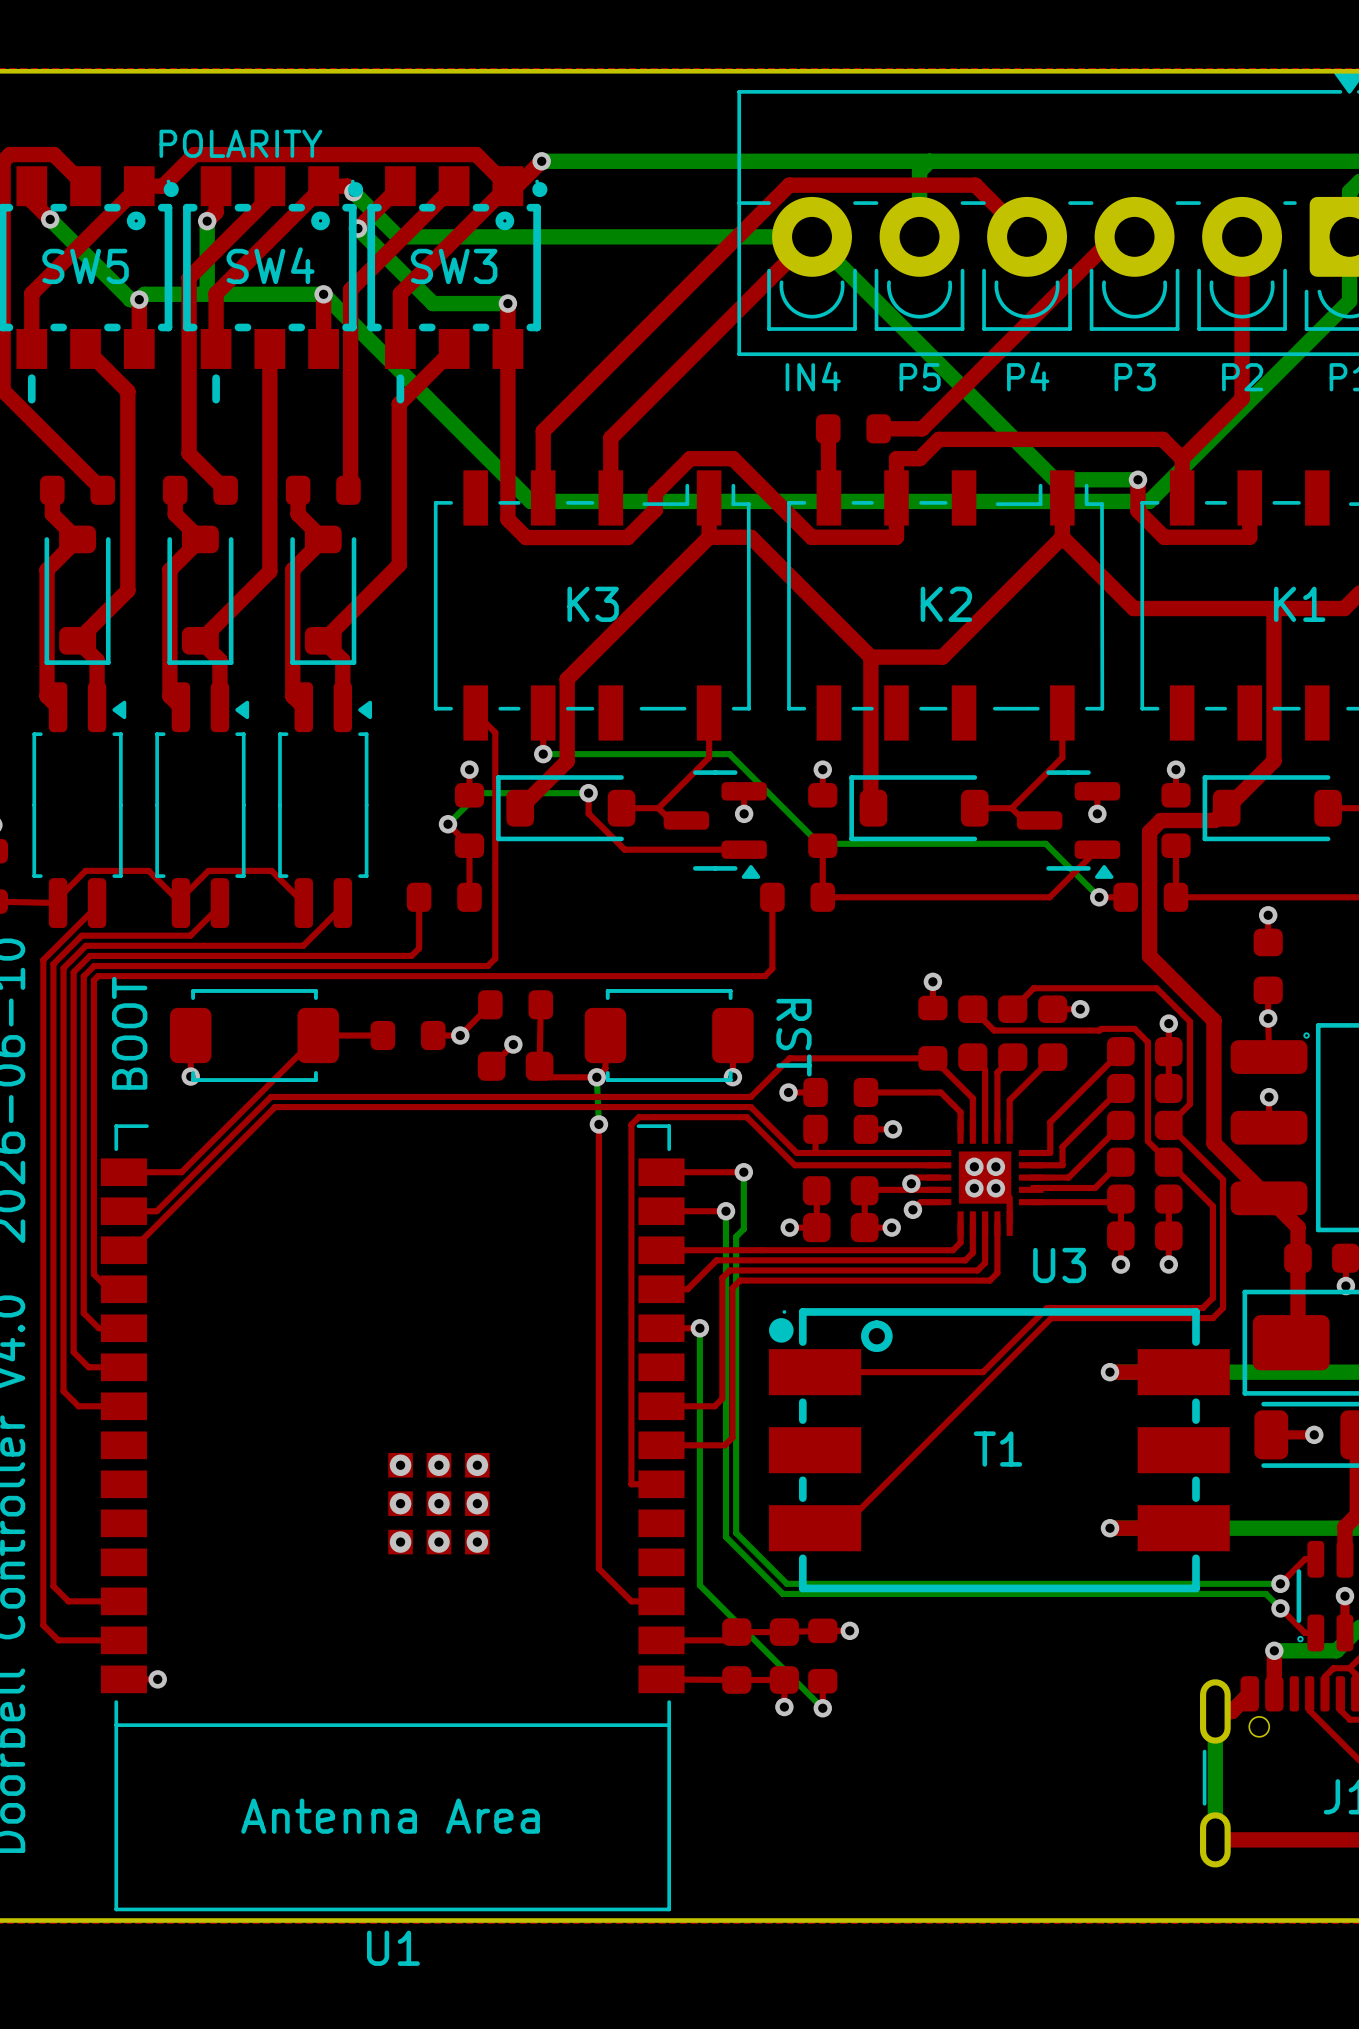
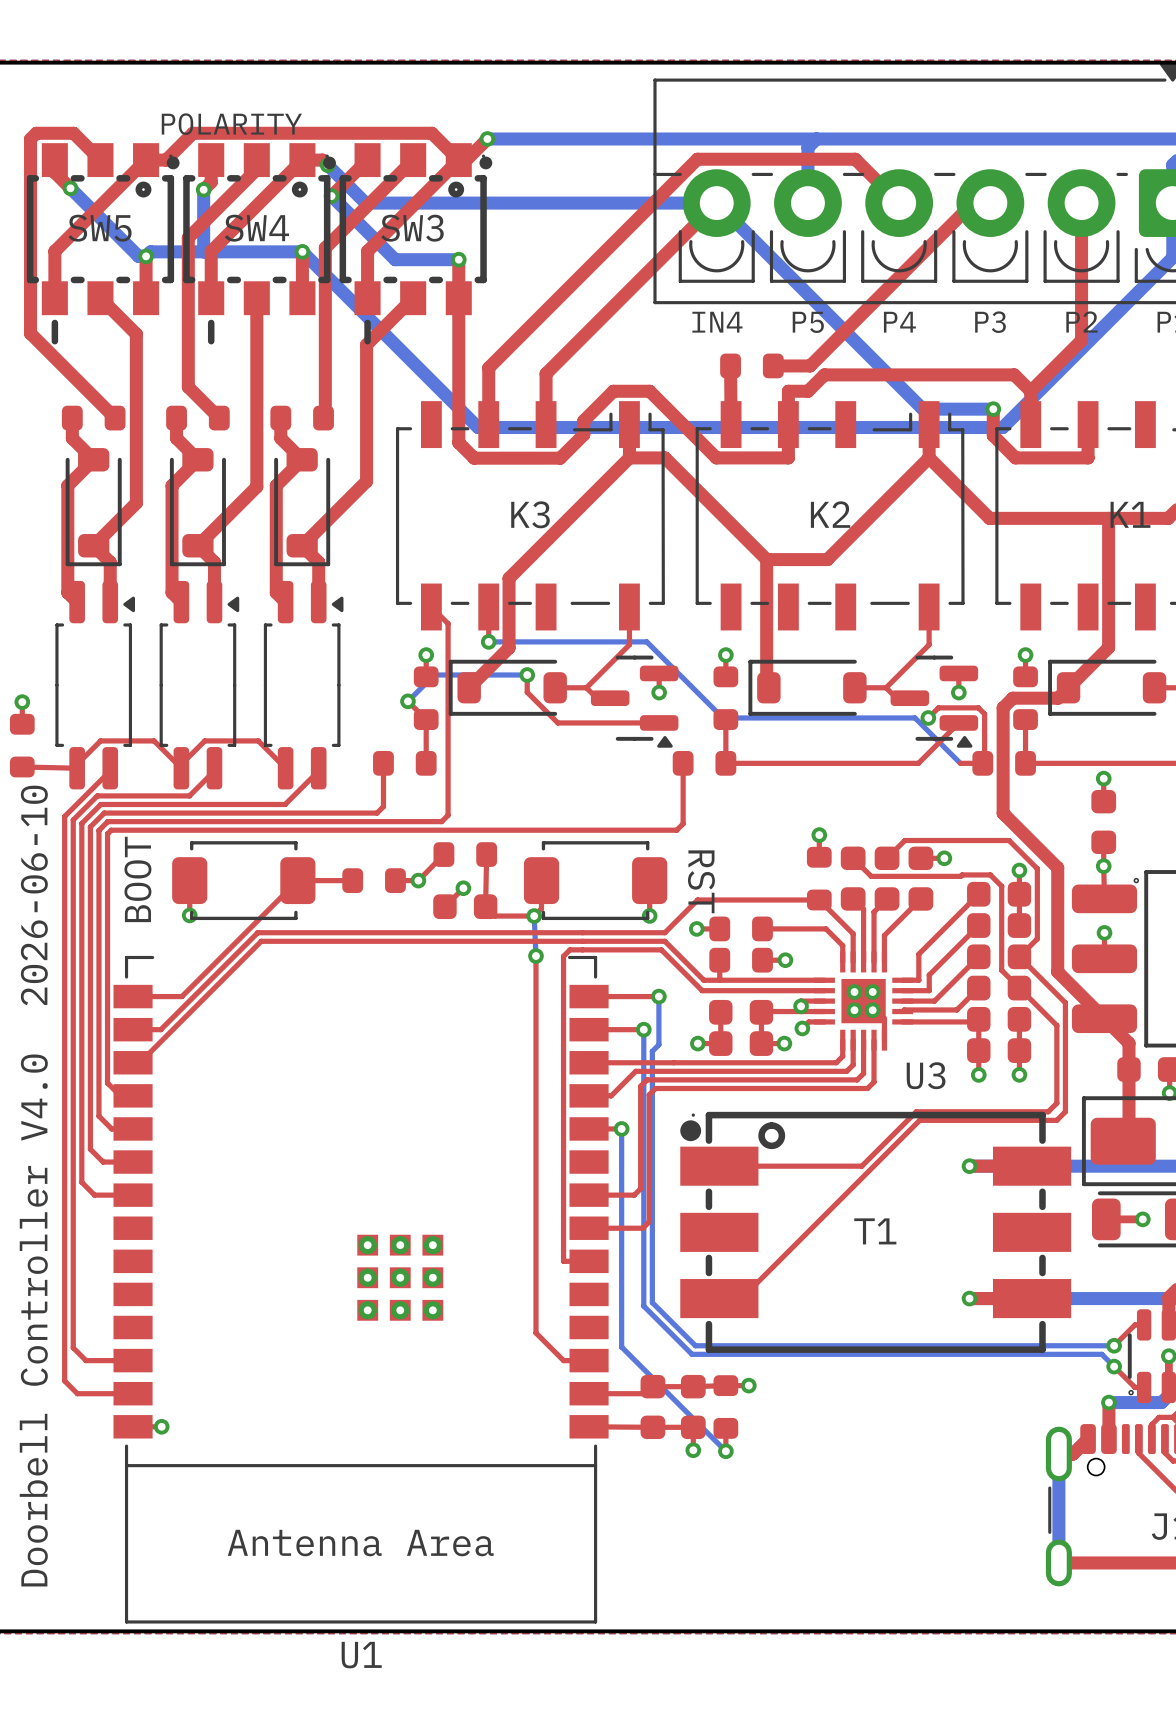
top track: none -> (928, 717) (938, 707) (978, 707) (984, 714) (984, 763)
via position: (1099, 897) -> (928, 717)

